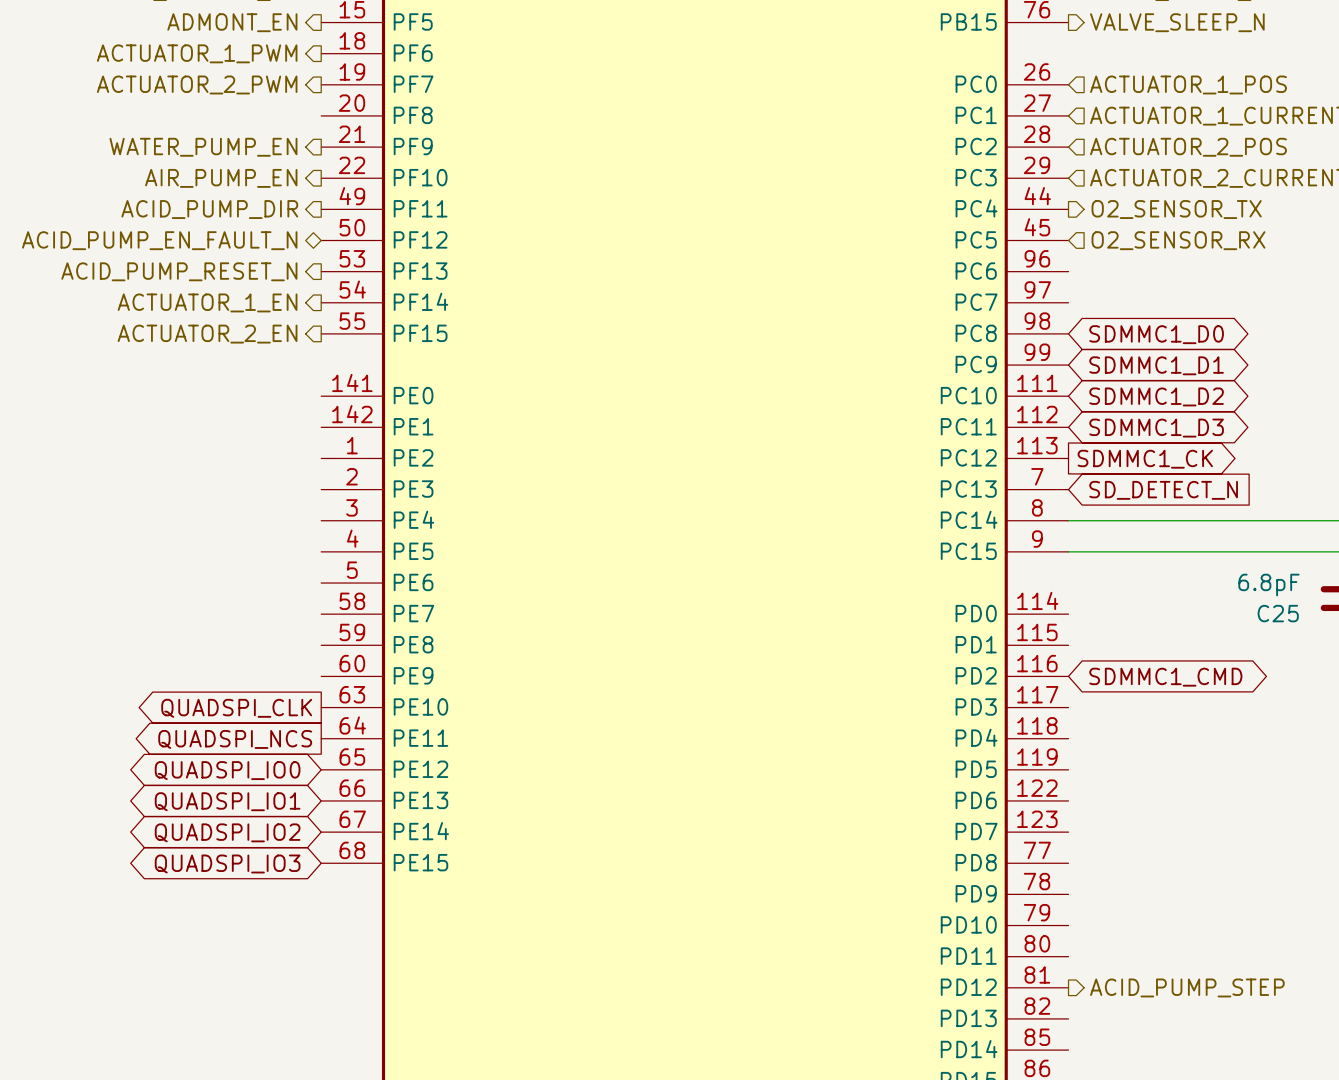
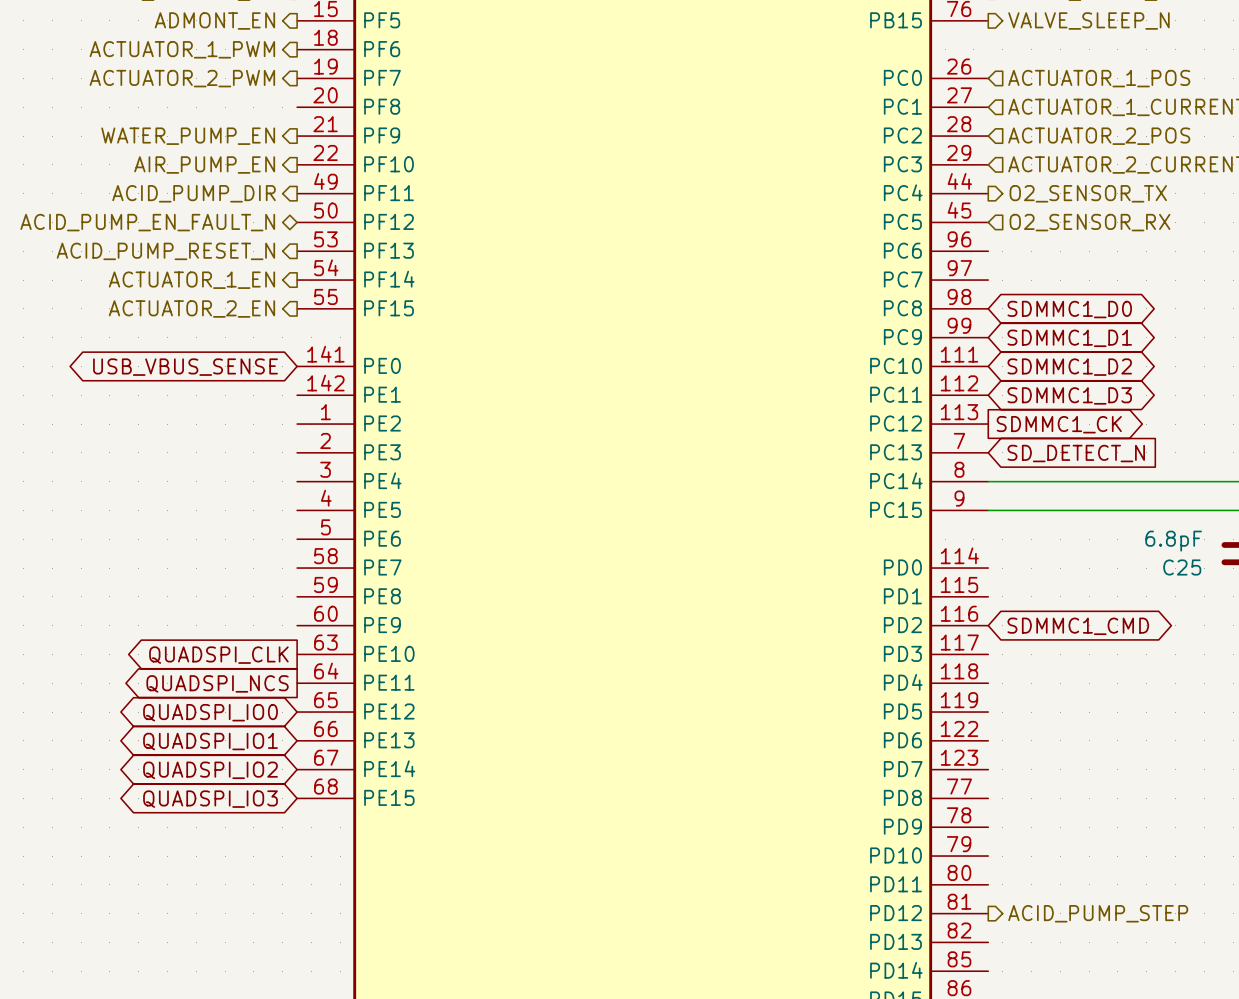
global label: none -> USB_VBUS_SENSE (185, 367)

